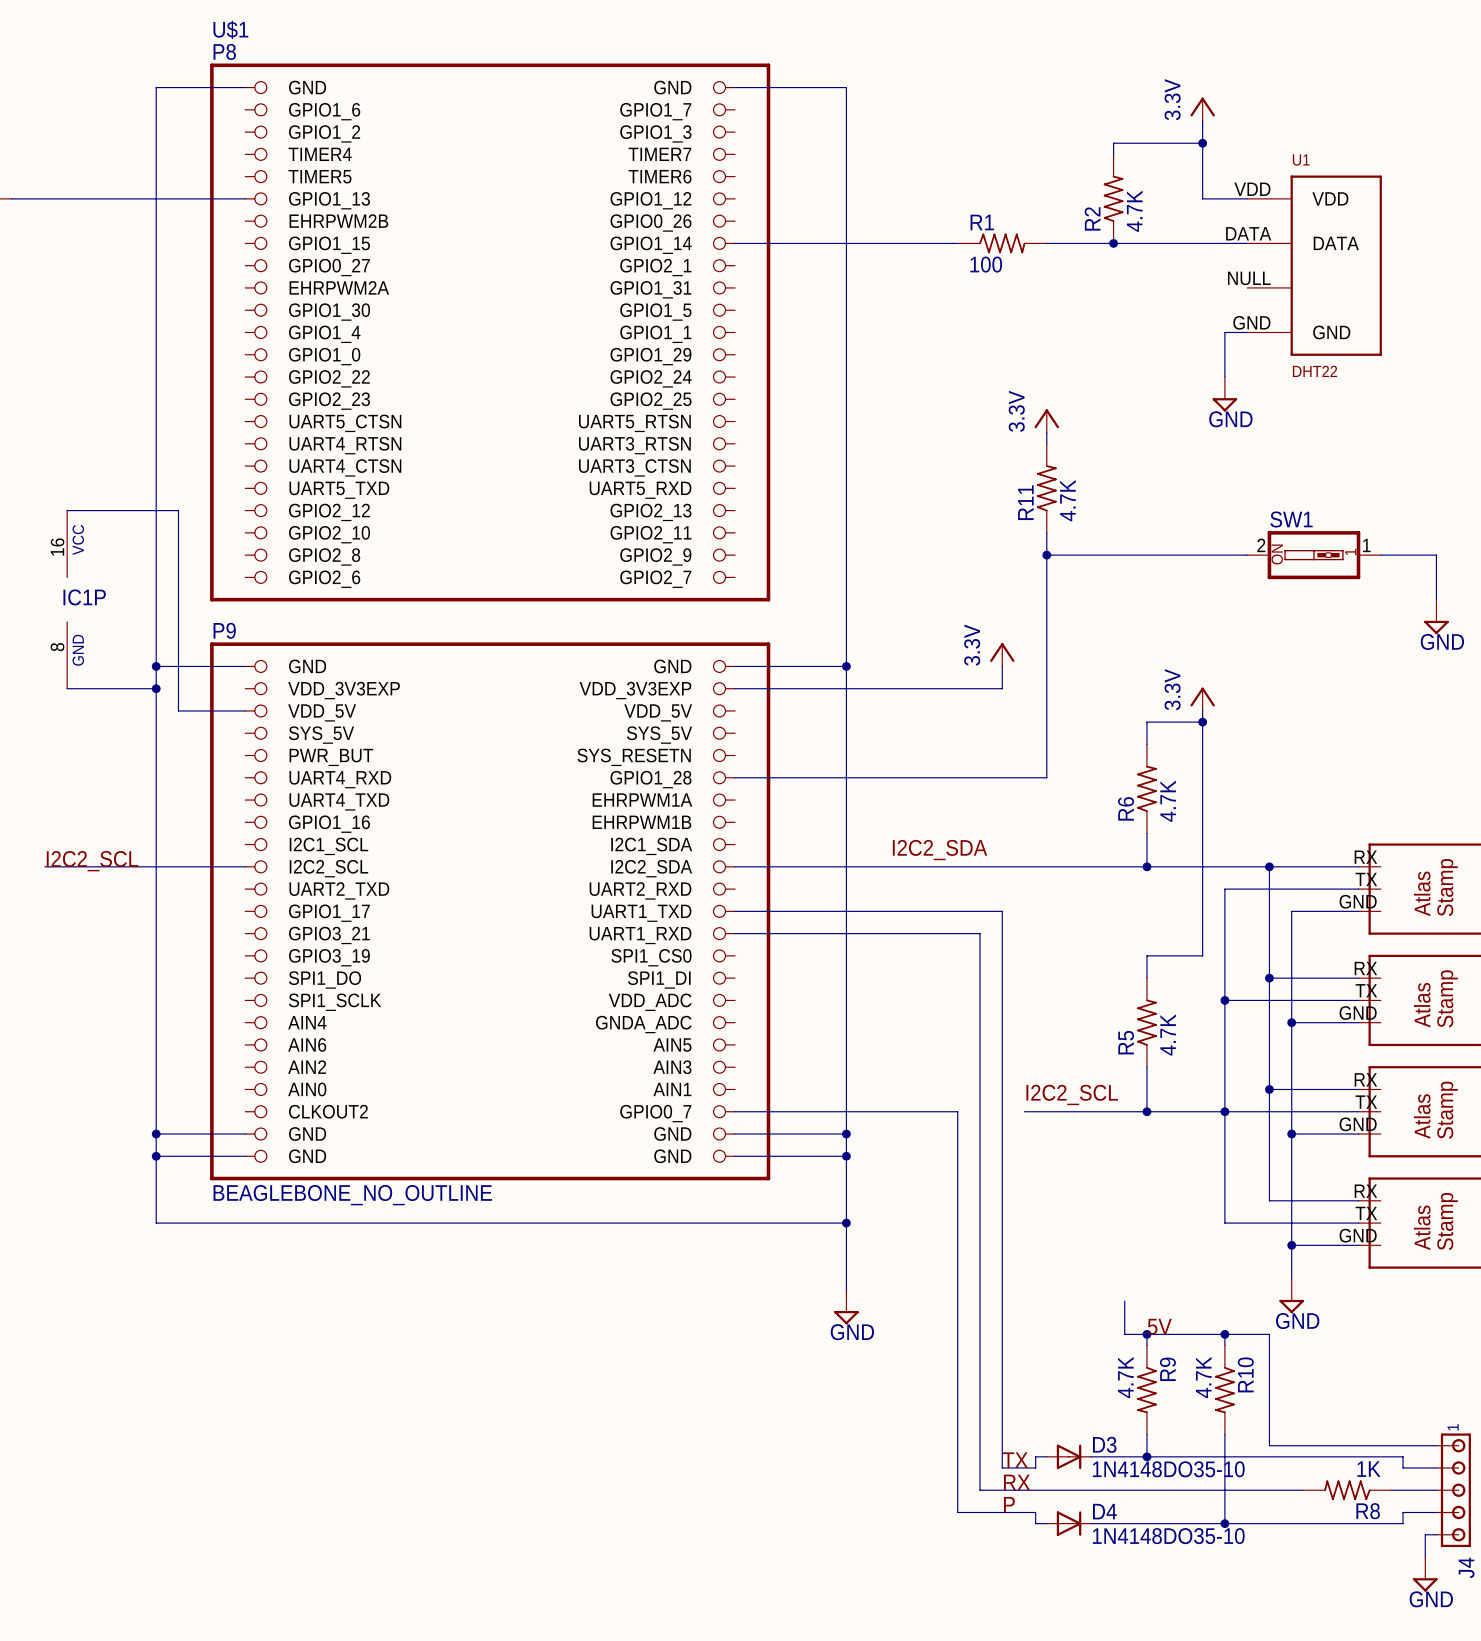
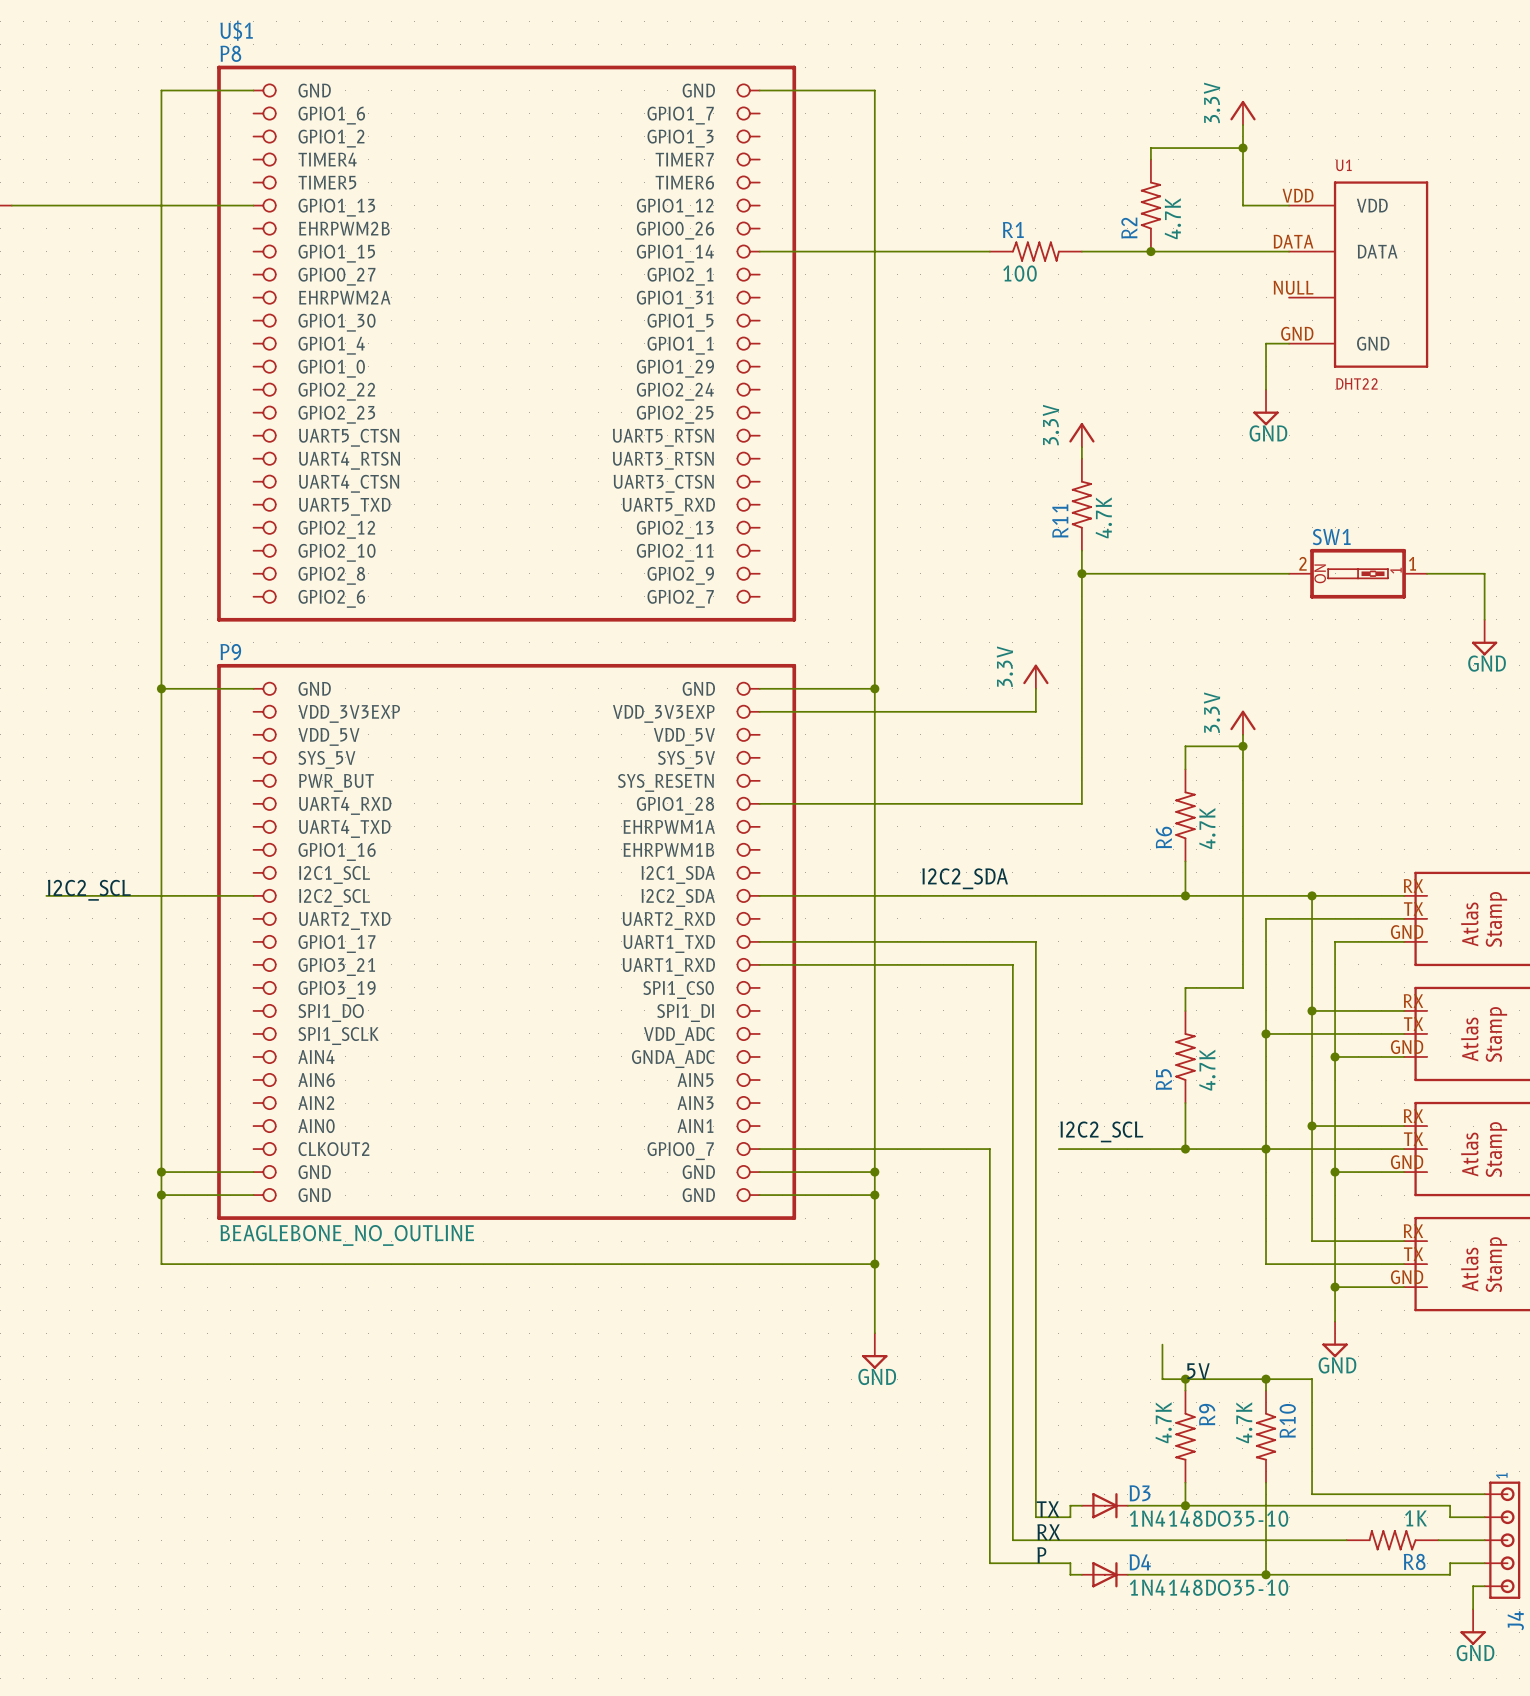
wire: (67, 510) (178, 510) (178, 710) (245, 710) -> none
IC1P: (67, 599) -> none
wire: (67, 688) (156, 688) -> none
junction: (156, 688) -> none

